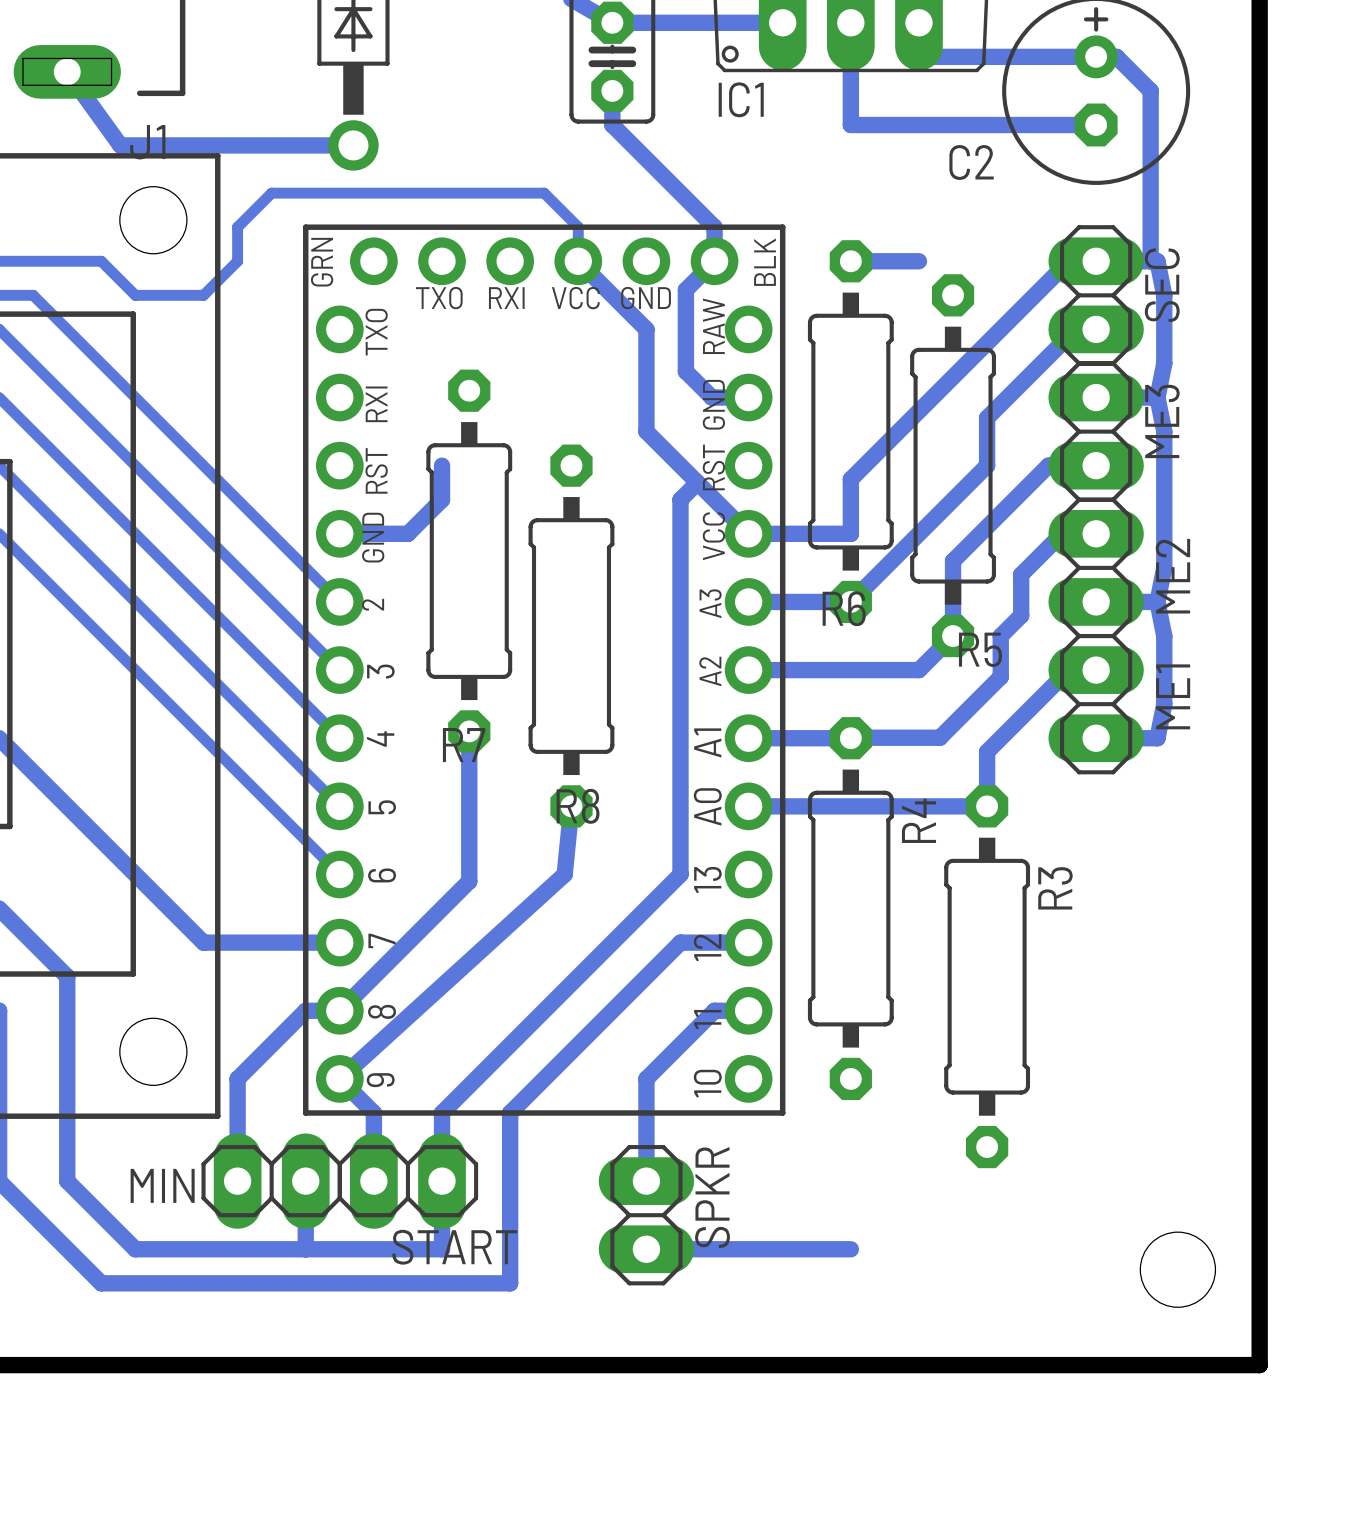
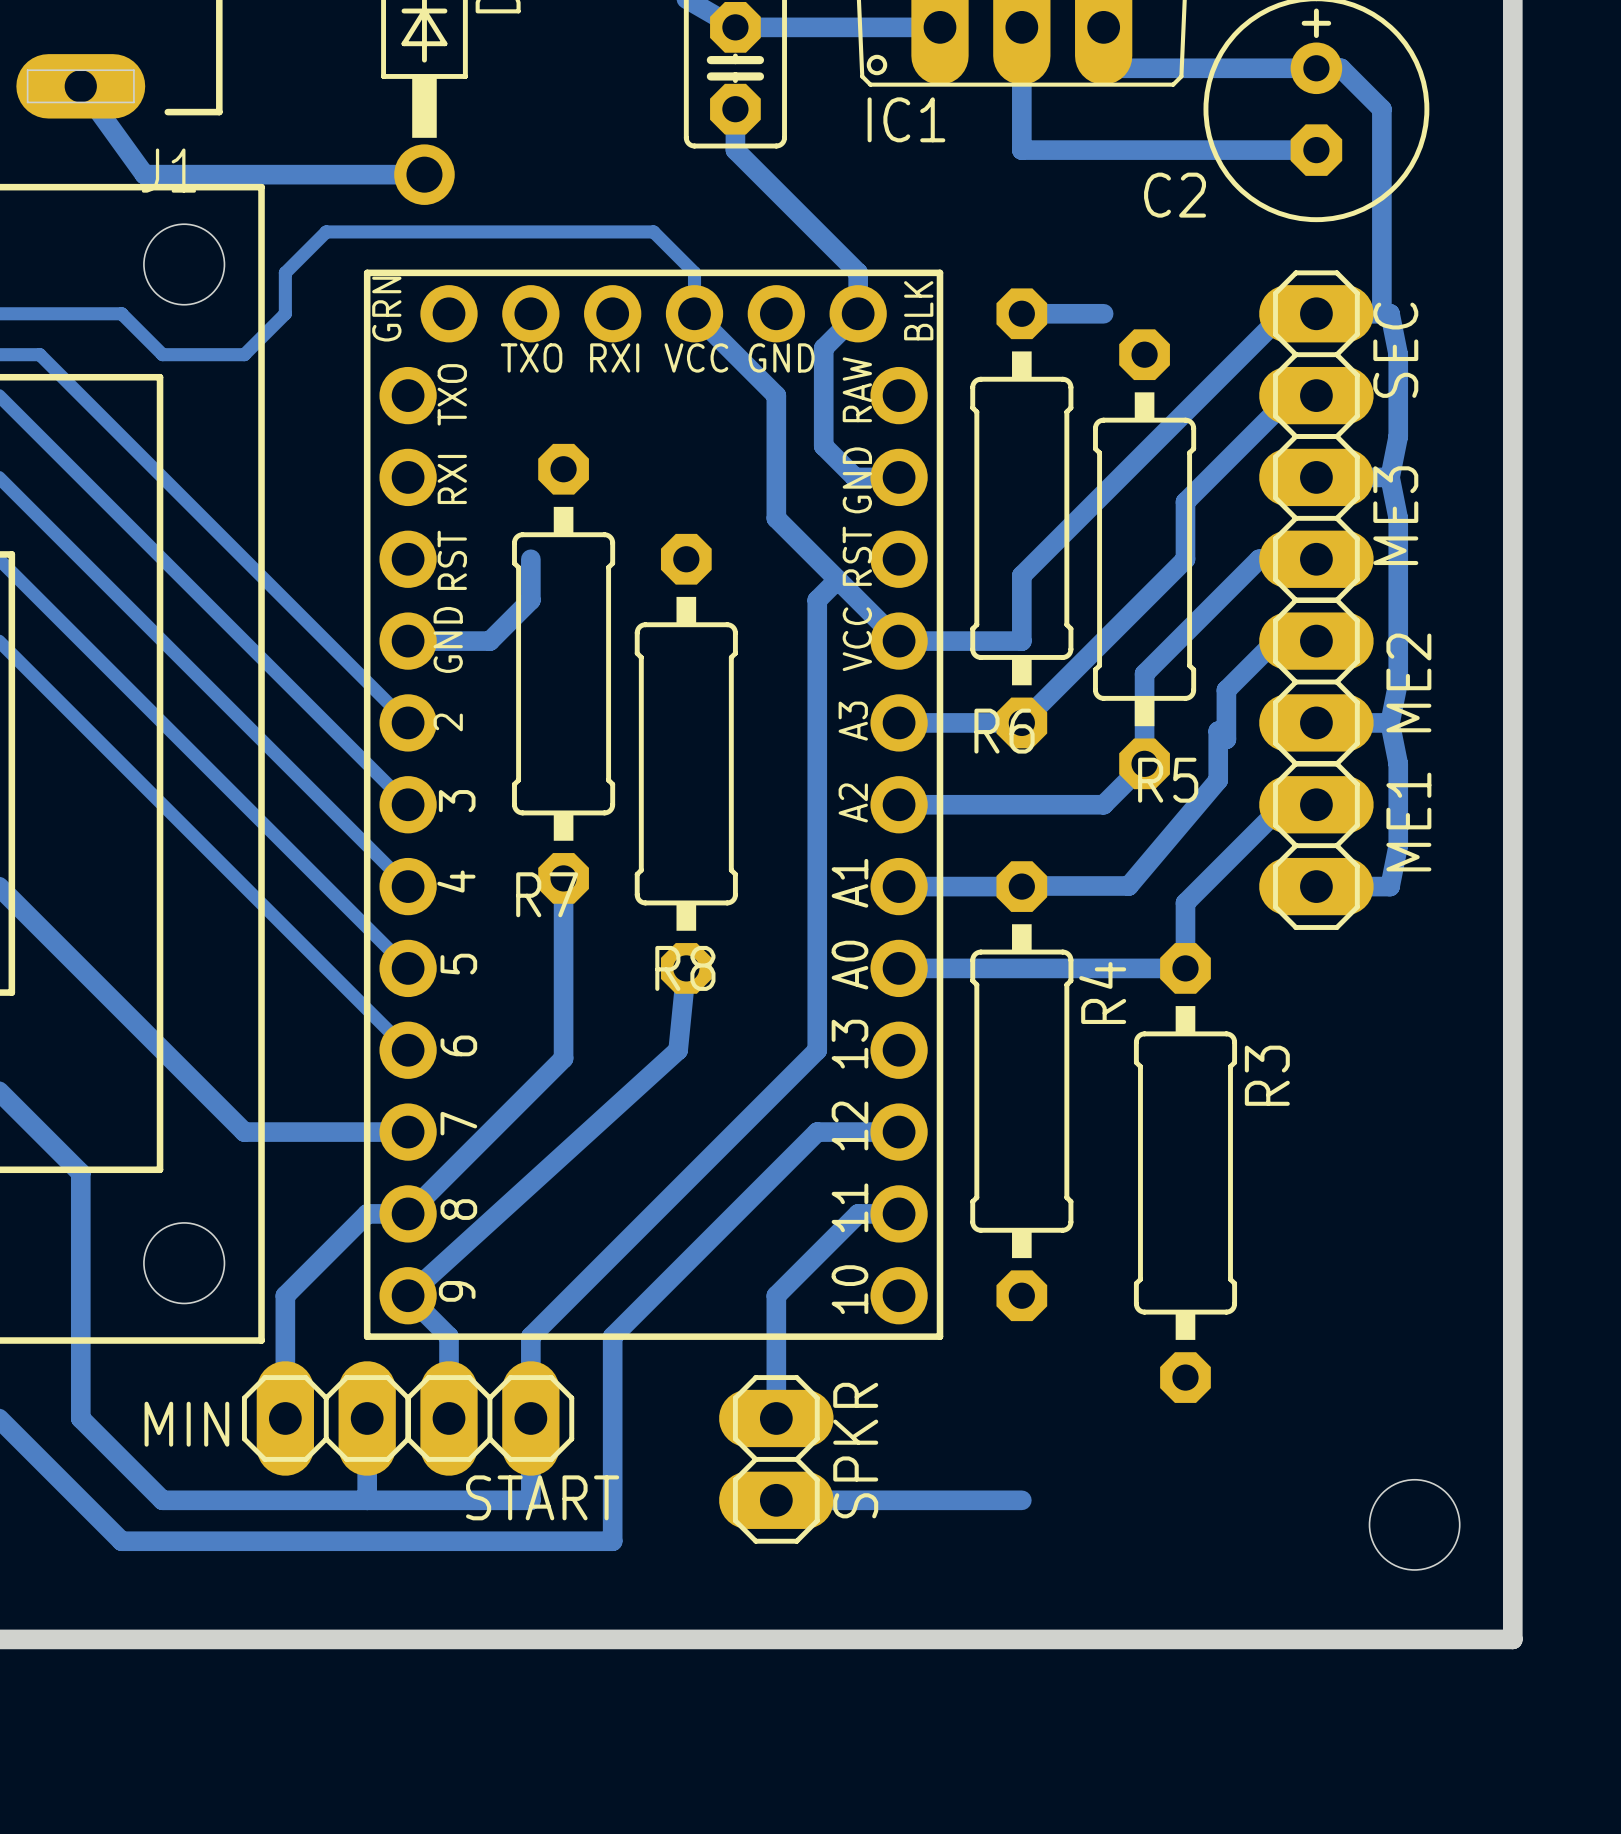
bottom track: (1021, 615) (1000, 636) (1000, 676) (939, 737) -> (1226, 739) (1218, 731) (1218, 780) (1128, 886)

